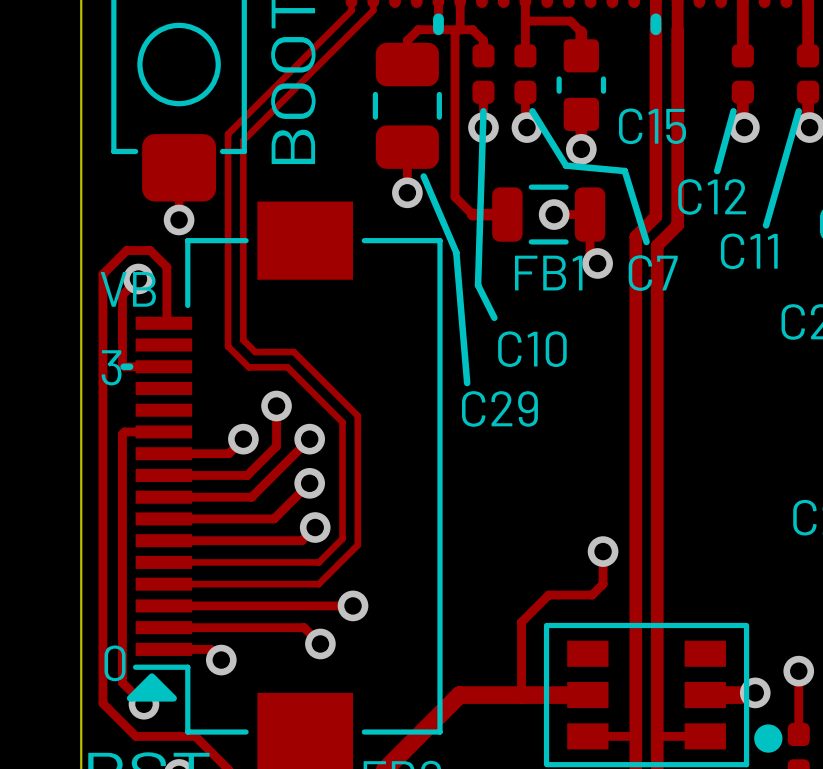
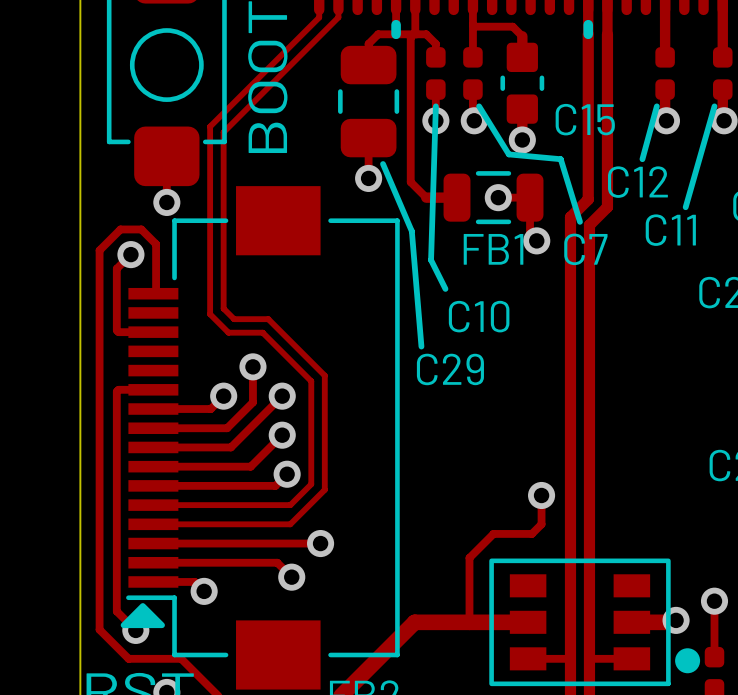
text: VB (128, 289) -> none
line: (123, 366) (130, 366) -> none
text: 3 (111, 367) -> none
text: 0 (115, 663) -> none

